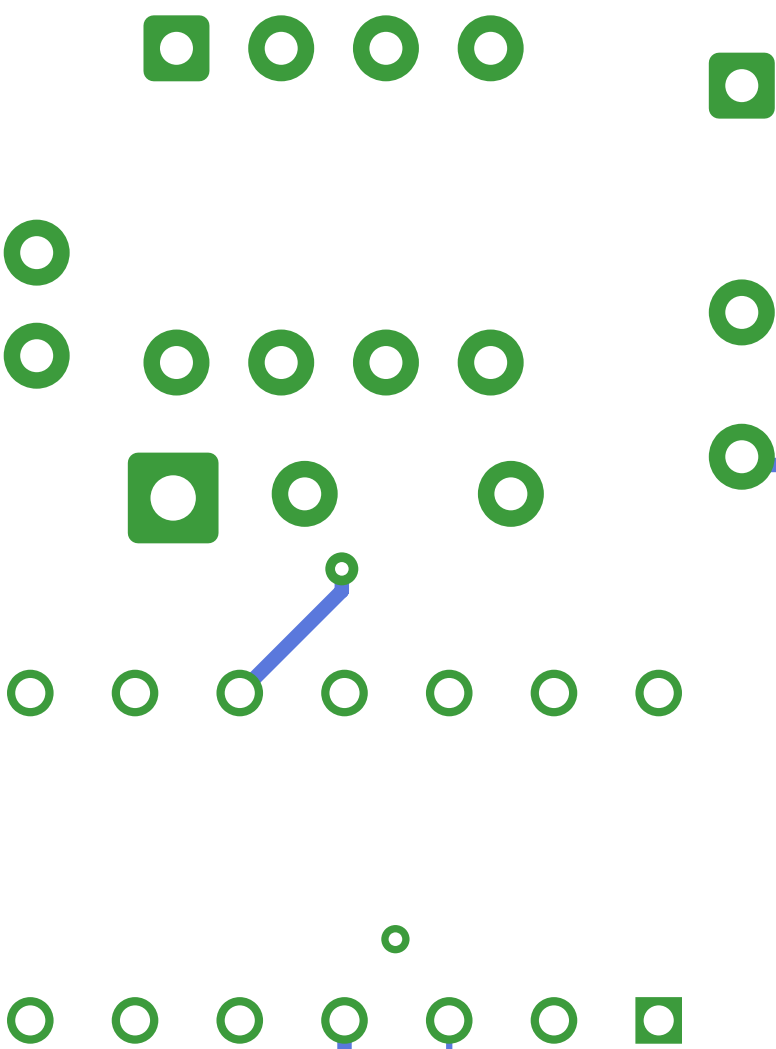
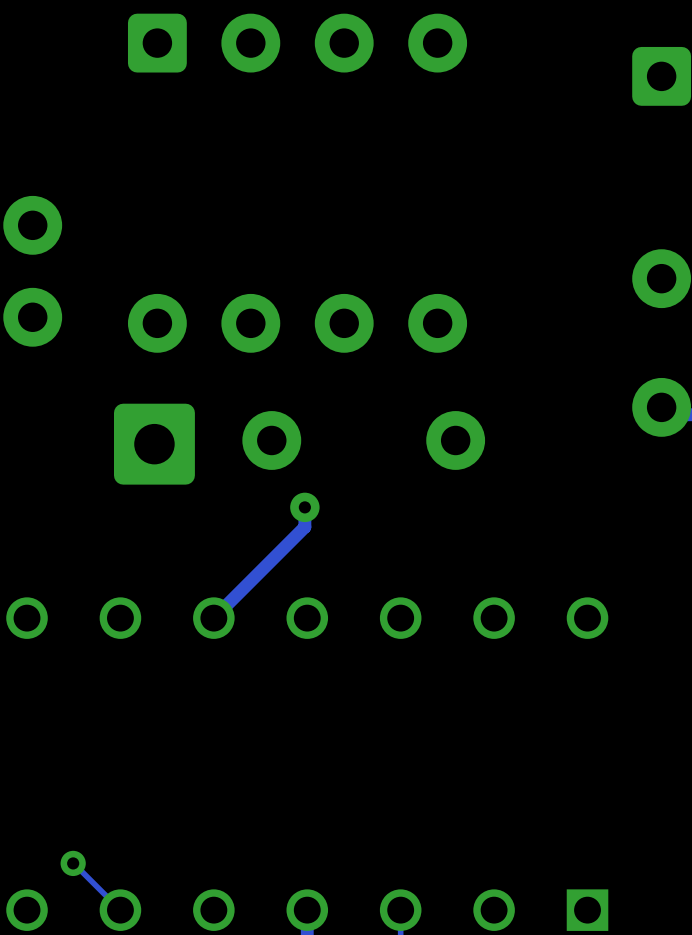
via: (395, 939) -> none
track: none -> (73, 863) (120, 910)
via: none -> (73, 863)

